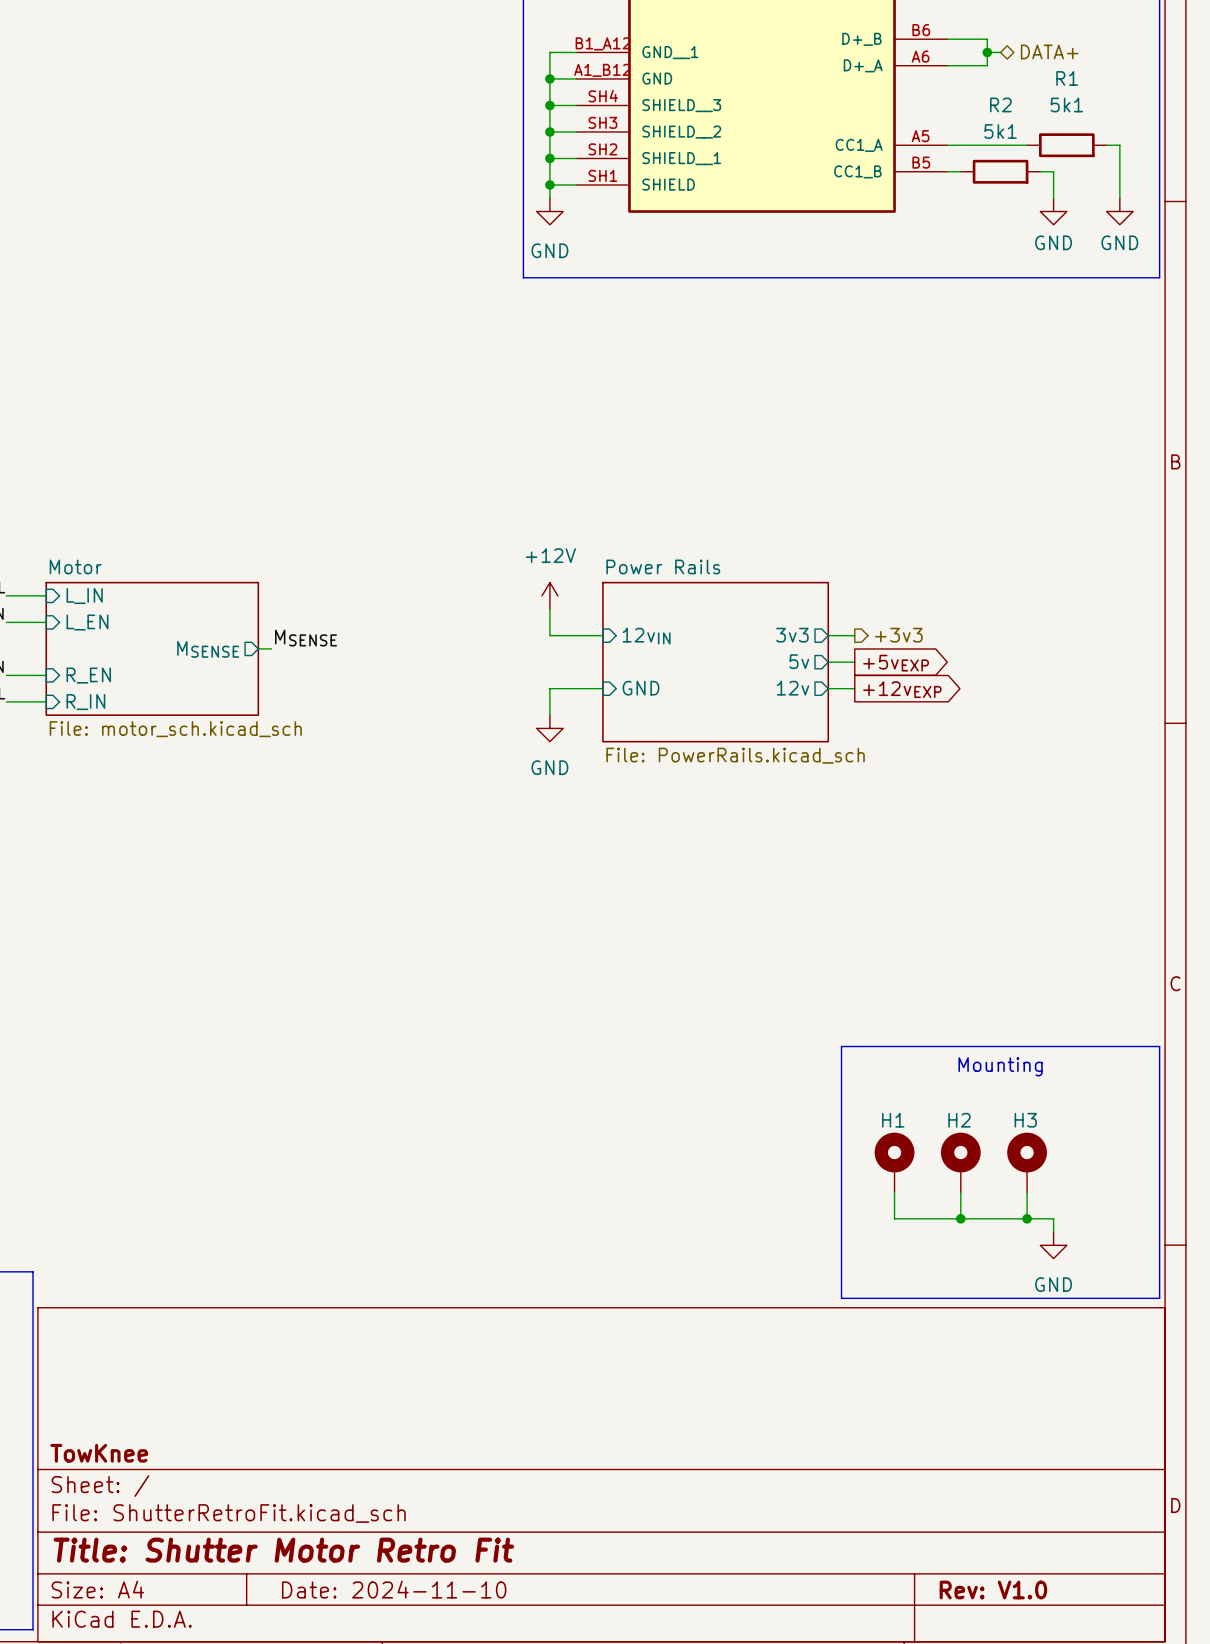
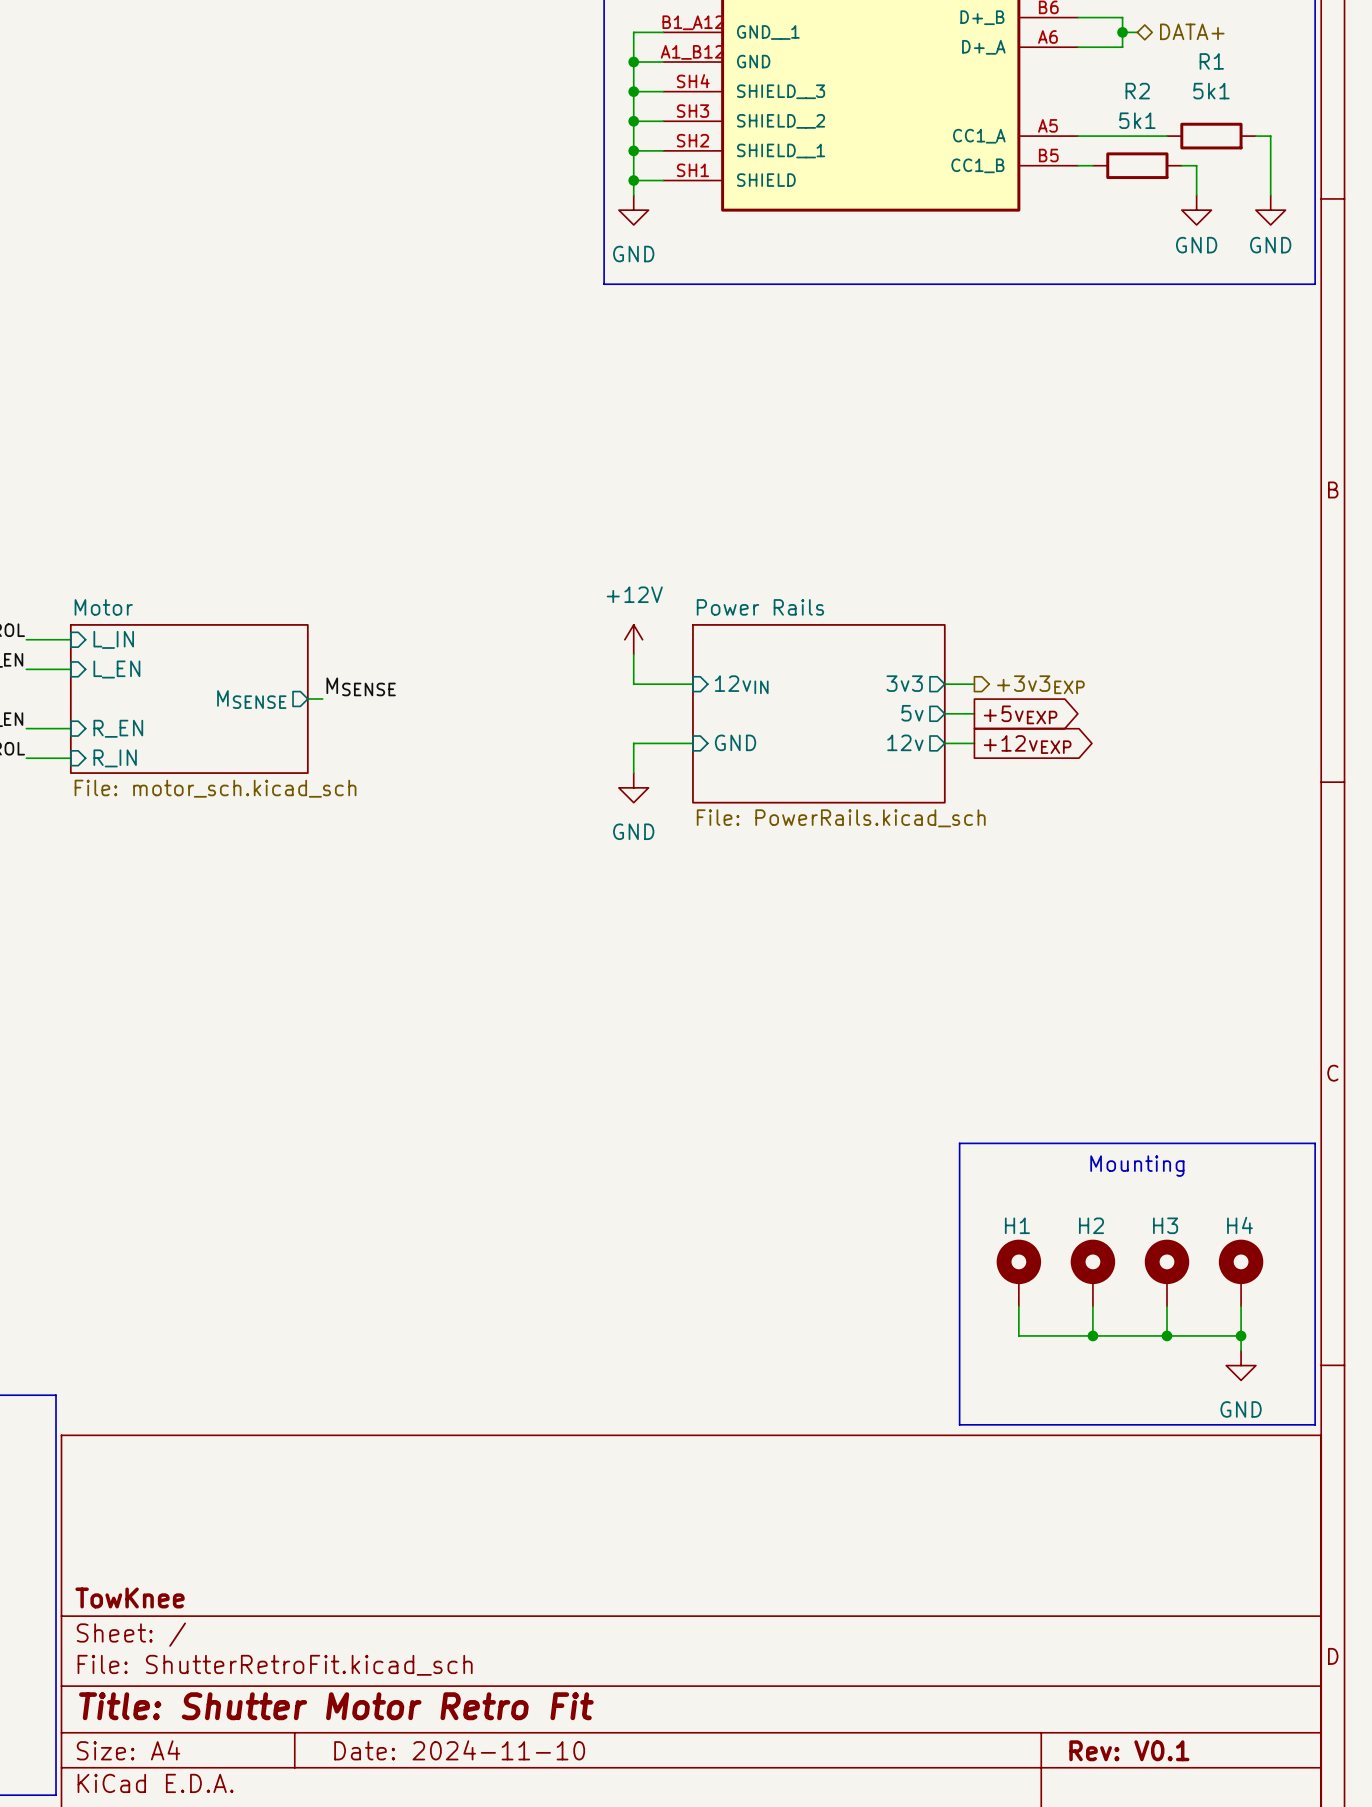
hierarchical label: +3v3 (898, 635) -> +3v3EXP (1040, 684)
H4: none -> (1241, 1273)
wire: none -> (1241, 1306) (1241, 1350)
wire: (1053, 1218) (1053, 1232) -> (1196, 1335) (1241, 1335)
junction: none -> (1241, 1335)
power symbol position: GND (1053, 1245) -> GND (1241, 1365)
title block: Rev: V1.0 (993, 1589) -> Rev: V0.1 (1129, 1750)

